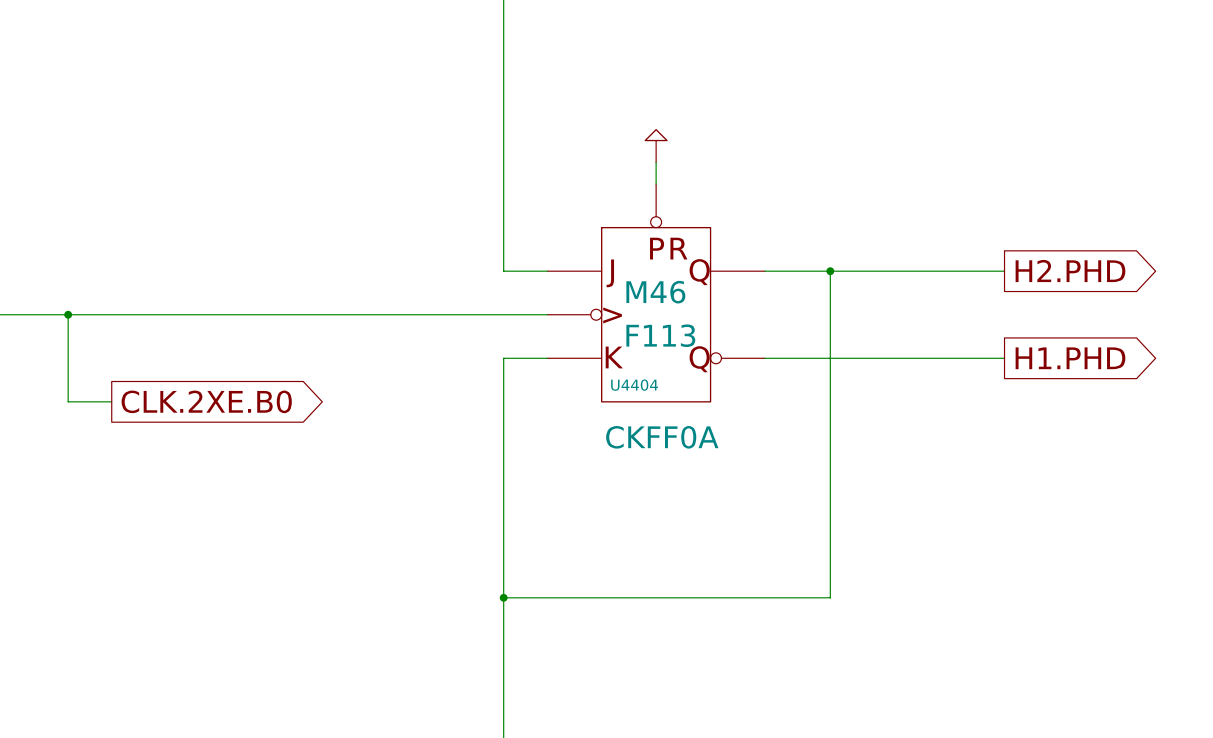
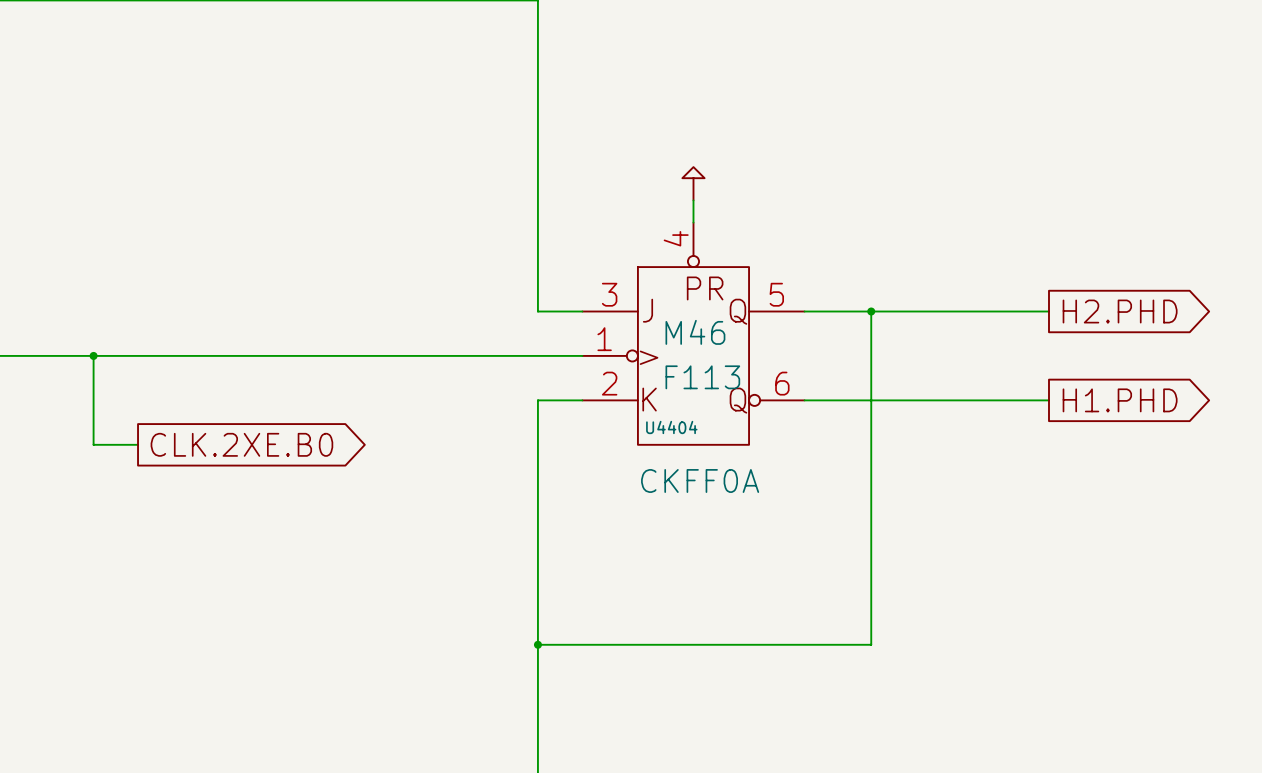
U4404 pin number: none -> 4 (676, 238)
U4404 pin number: none -> 3 (609, 294)
U4404 pin number: none -> 5 (776, 294)
U4404 pin number: none -> 1 (604, 339)
U4404 pin number: none -> 2 (609, 383)
U4404 pin number: none -> 6 (782, 383)

